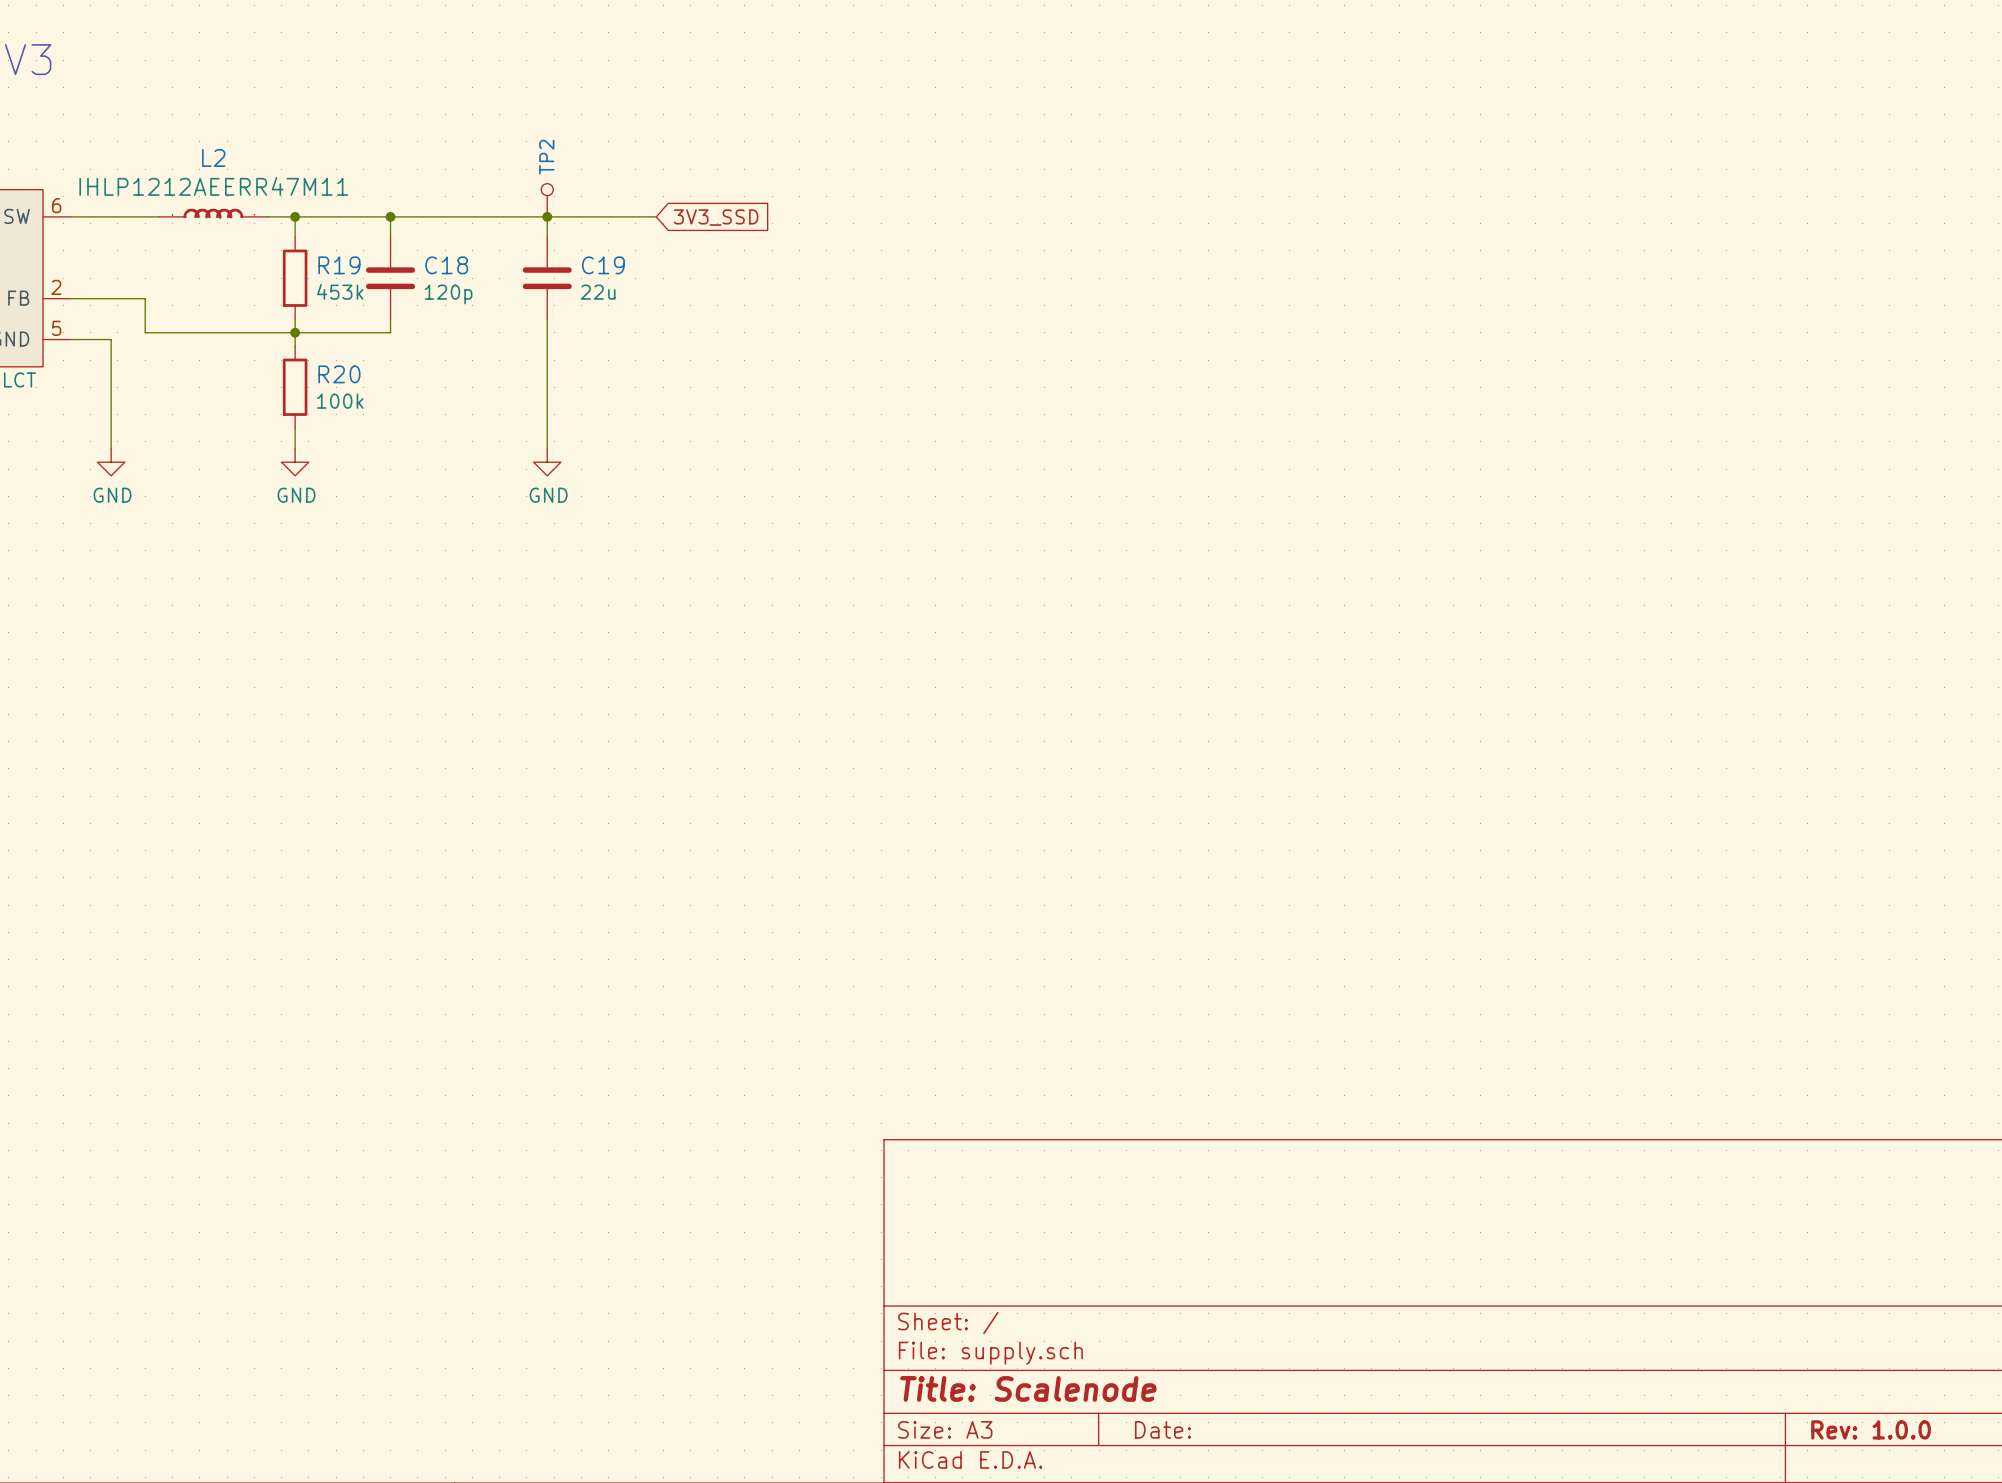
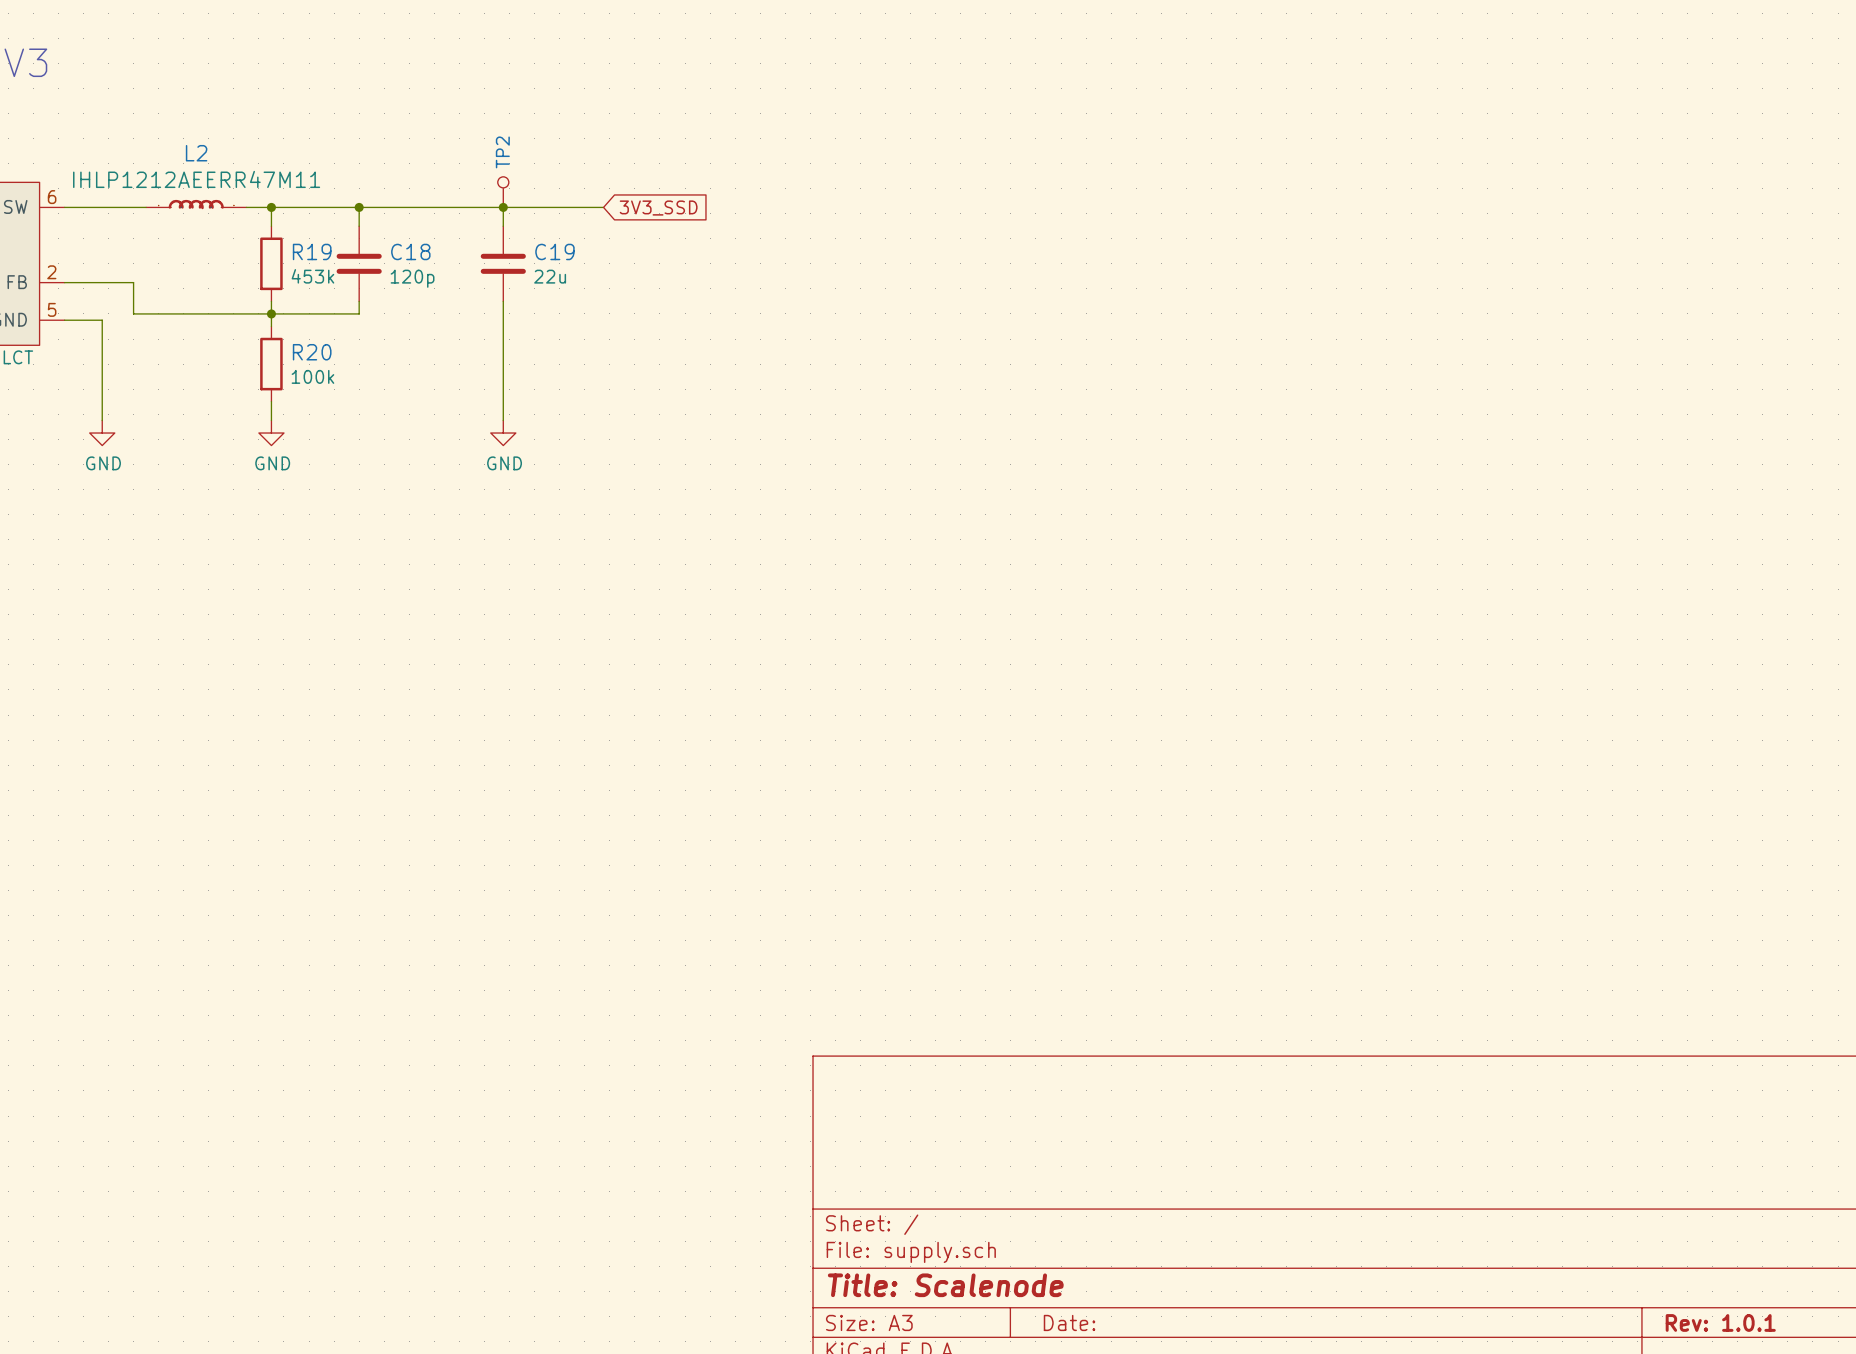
title block: Rev: 1.0.0 (1871, 1429) -> Rev: 1.0.1 (1720, 1322)

